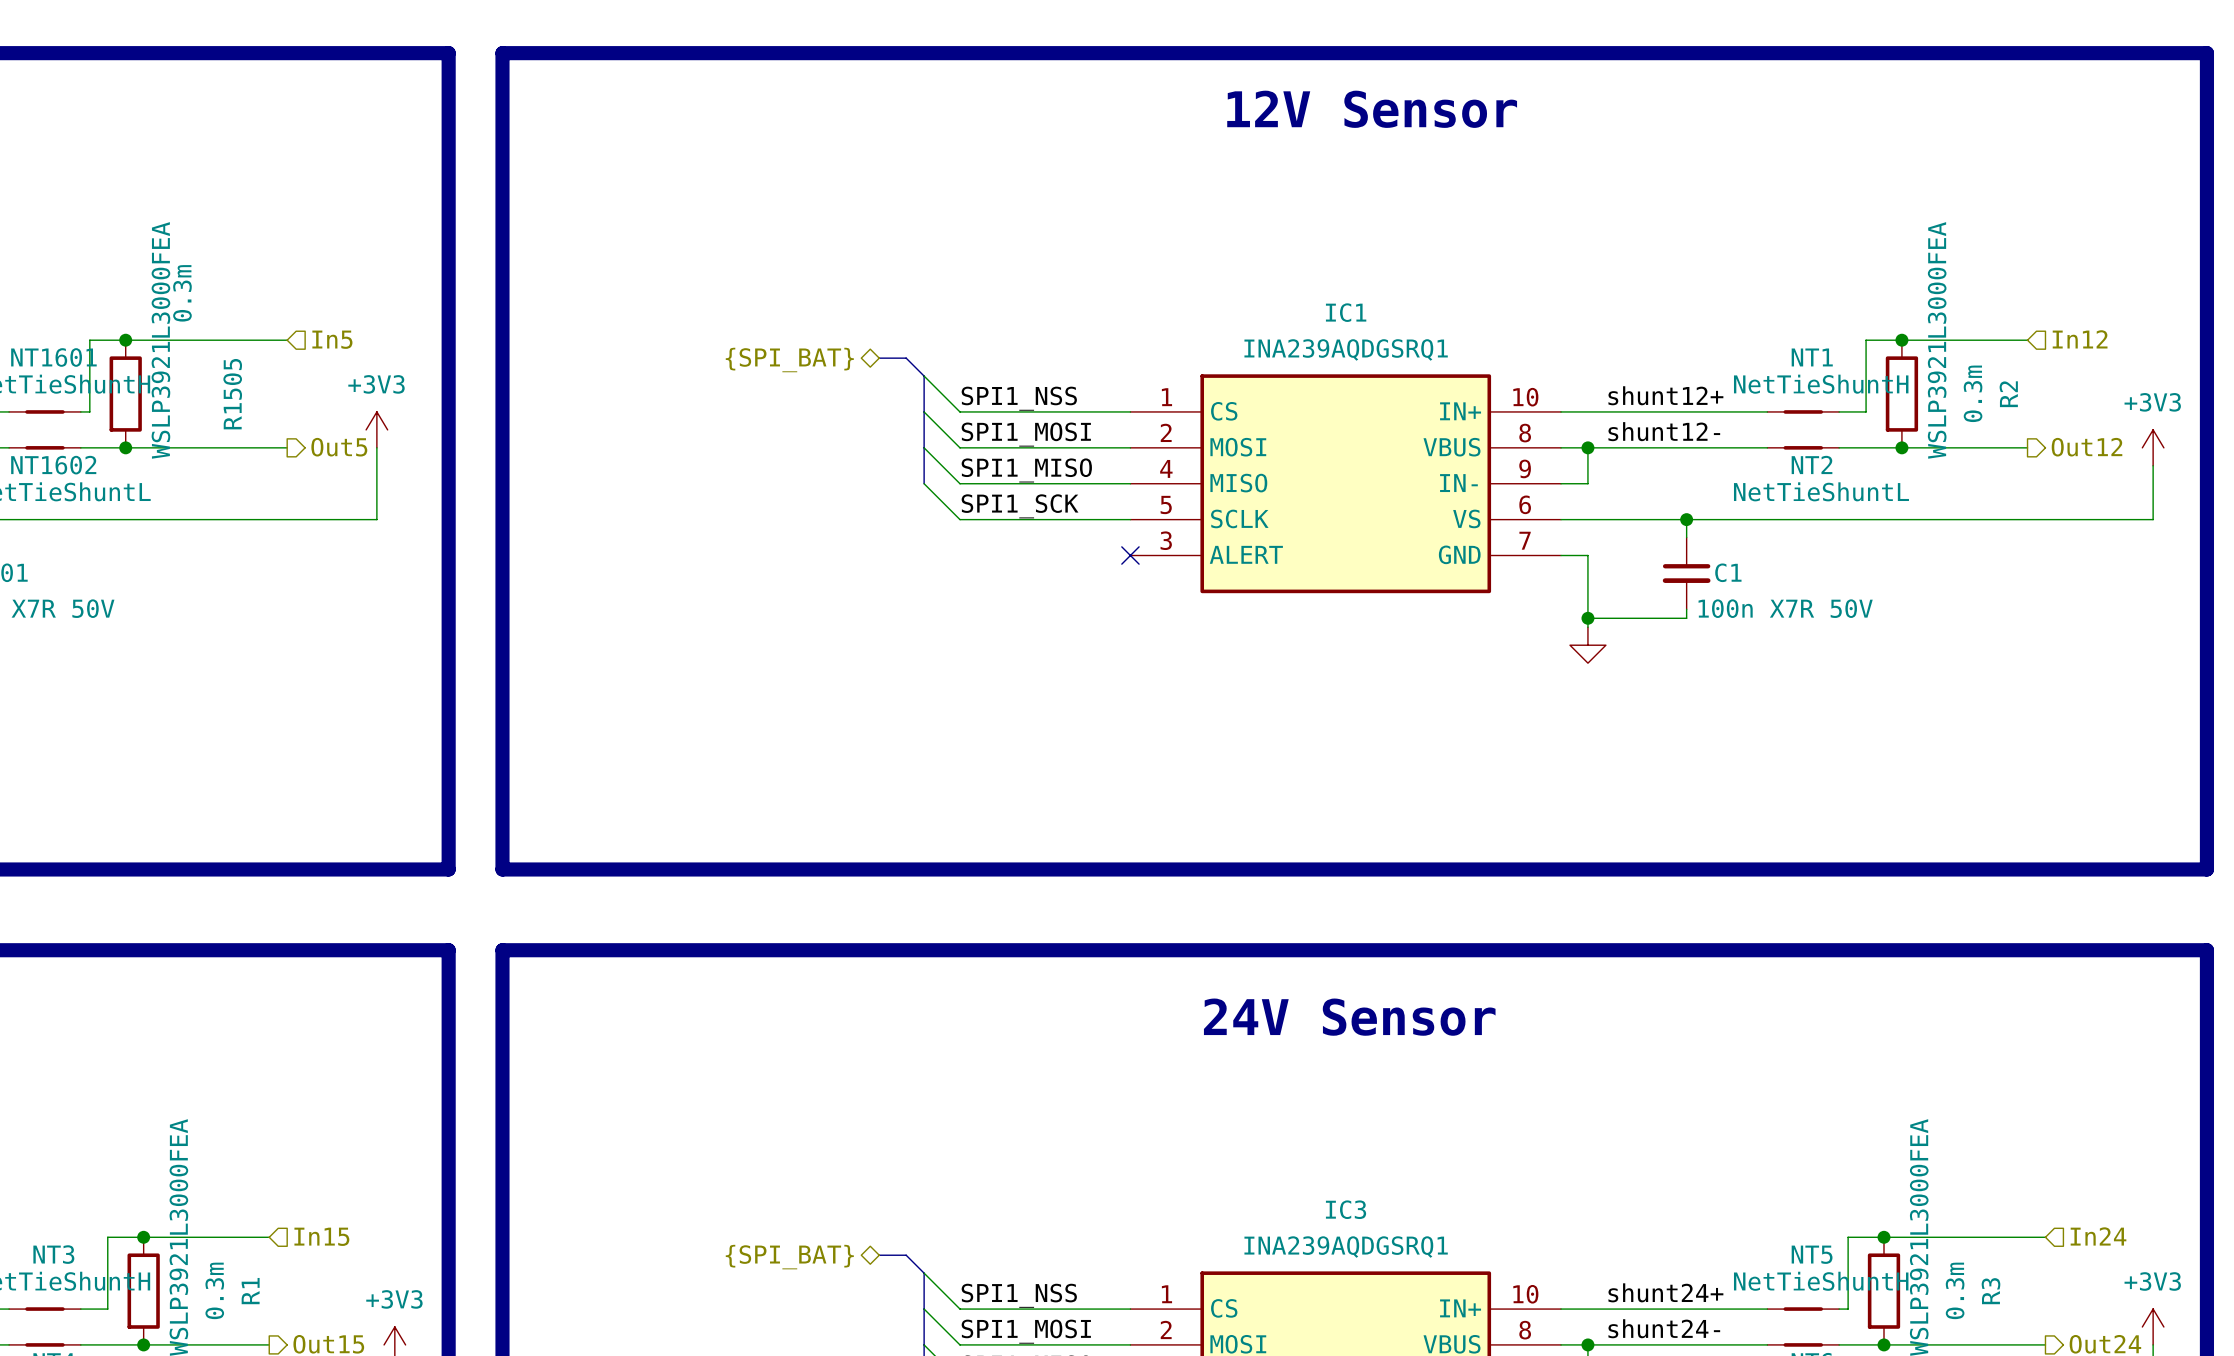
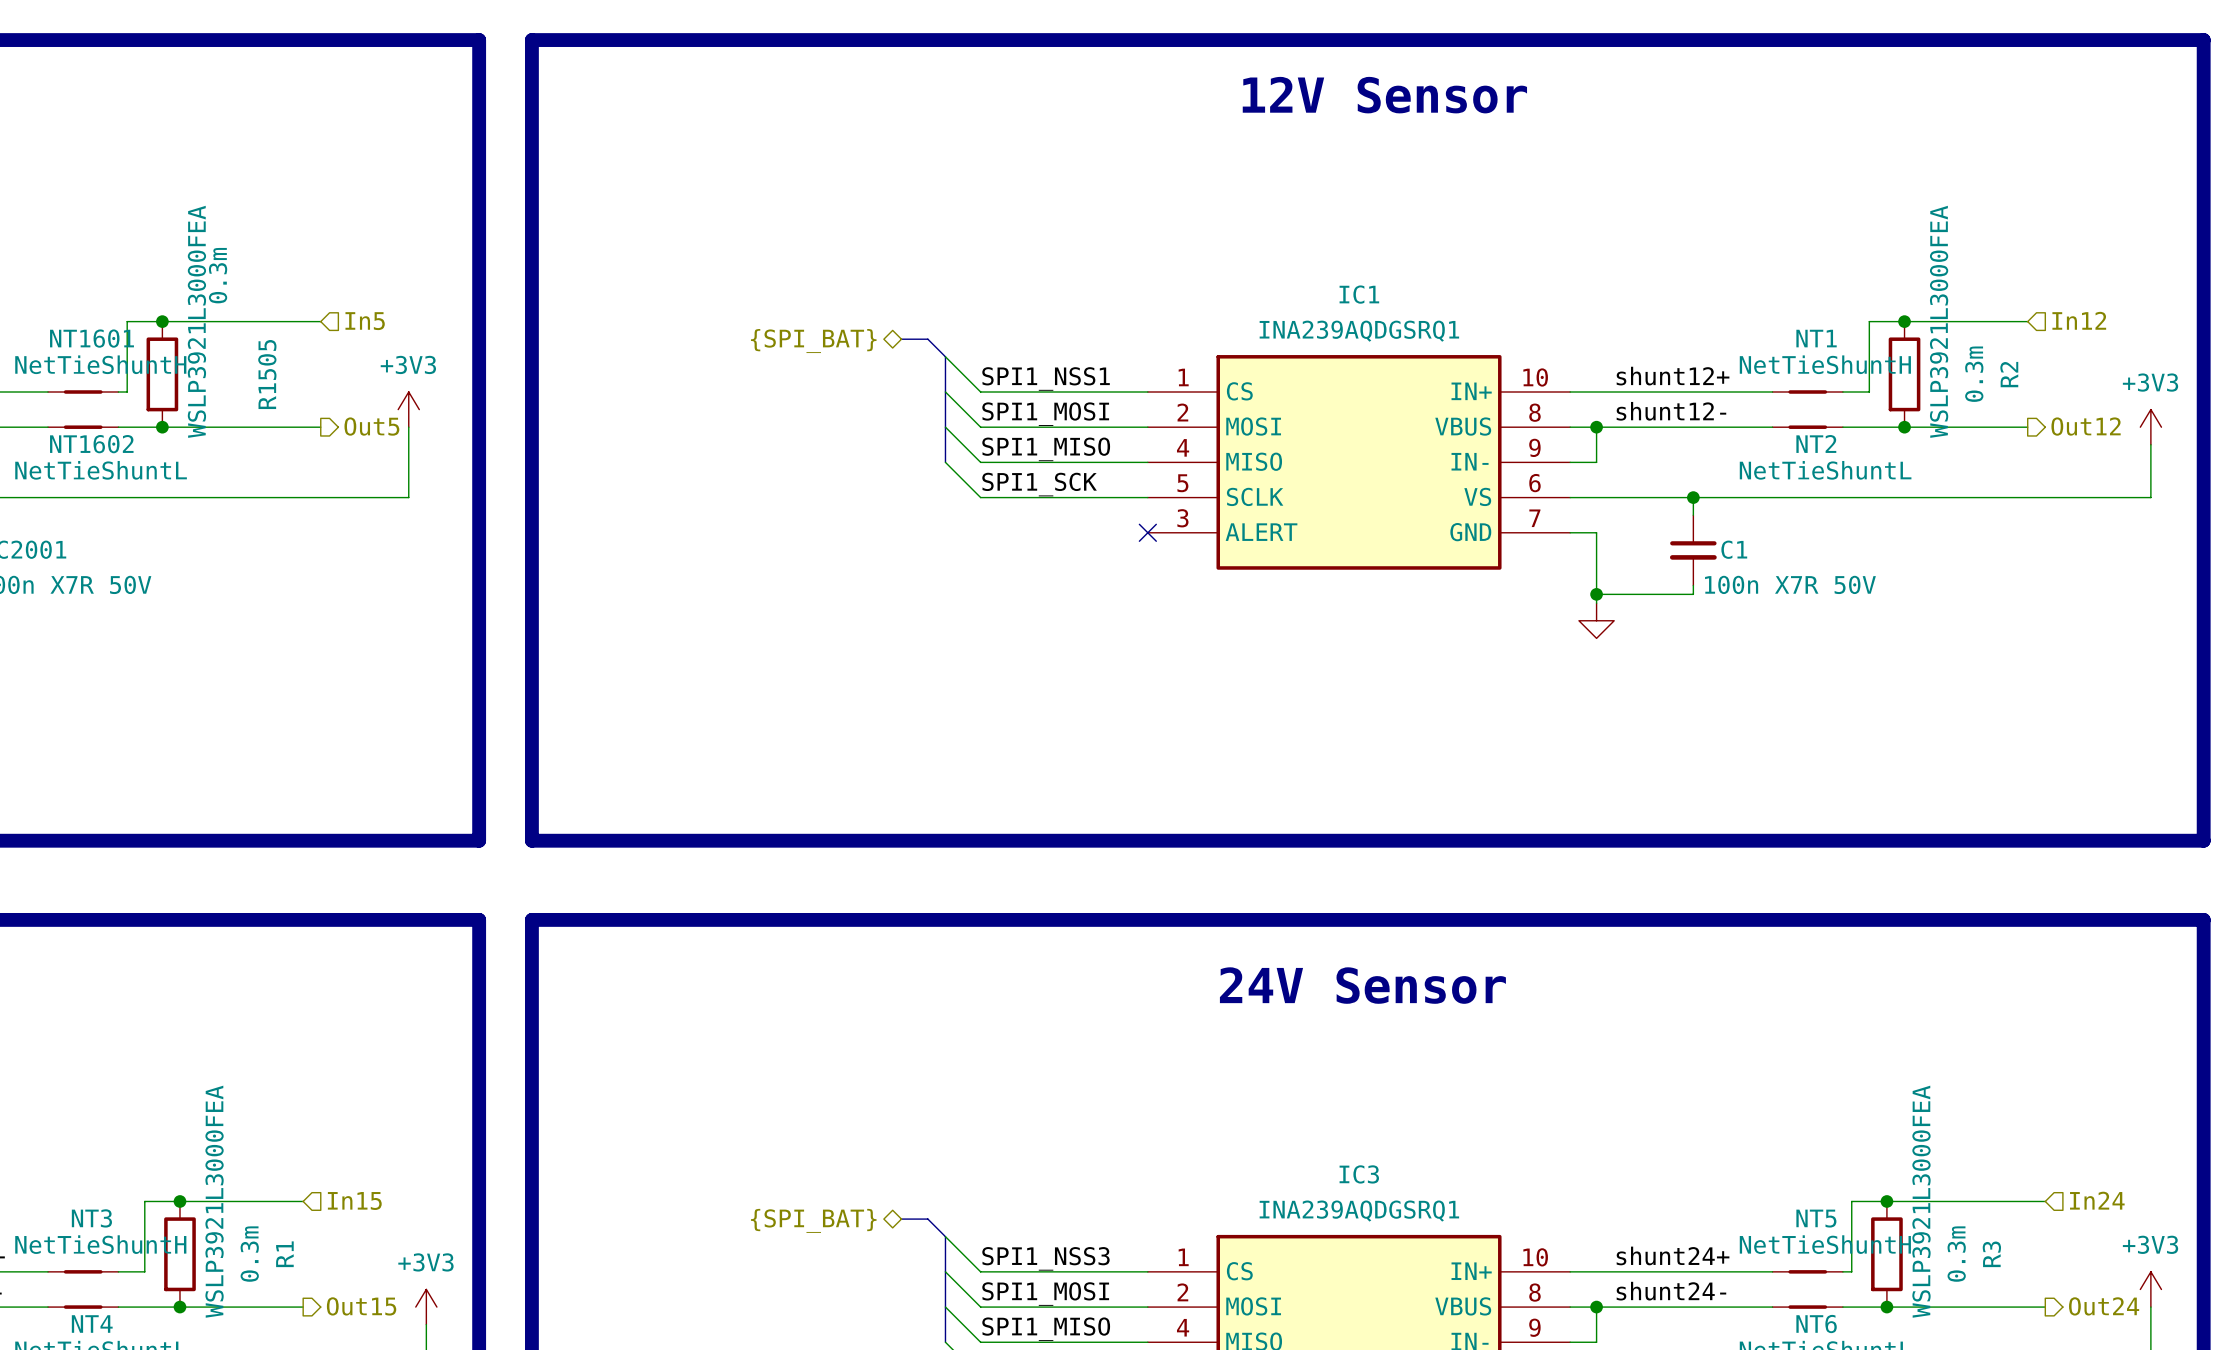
label: SPI1_NSS (1019, 398) -> SPI1_NSS1 (1046, 378)
label: SPI1_NSS (1019, 1295) -> SPI1_NSS3 (1045, 1258)

